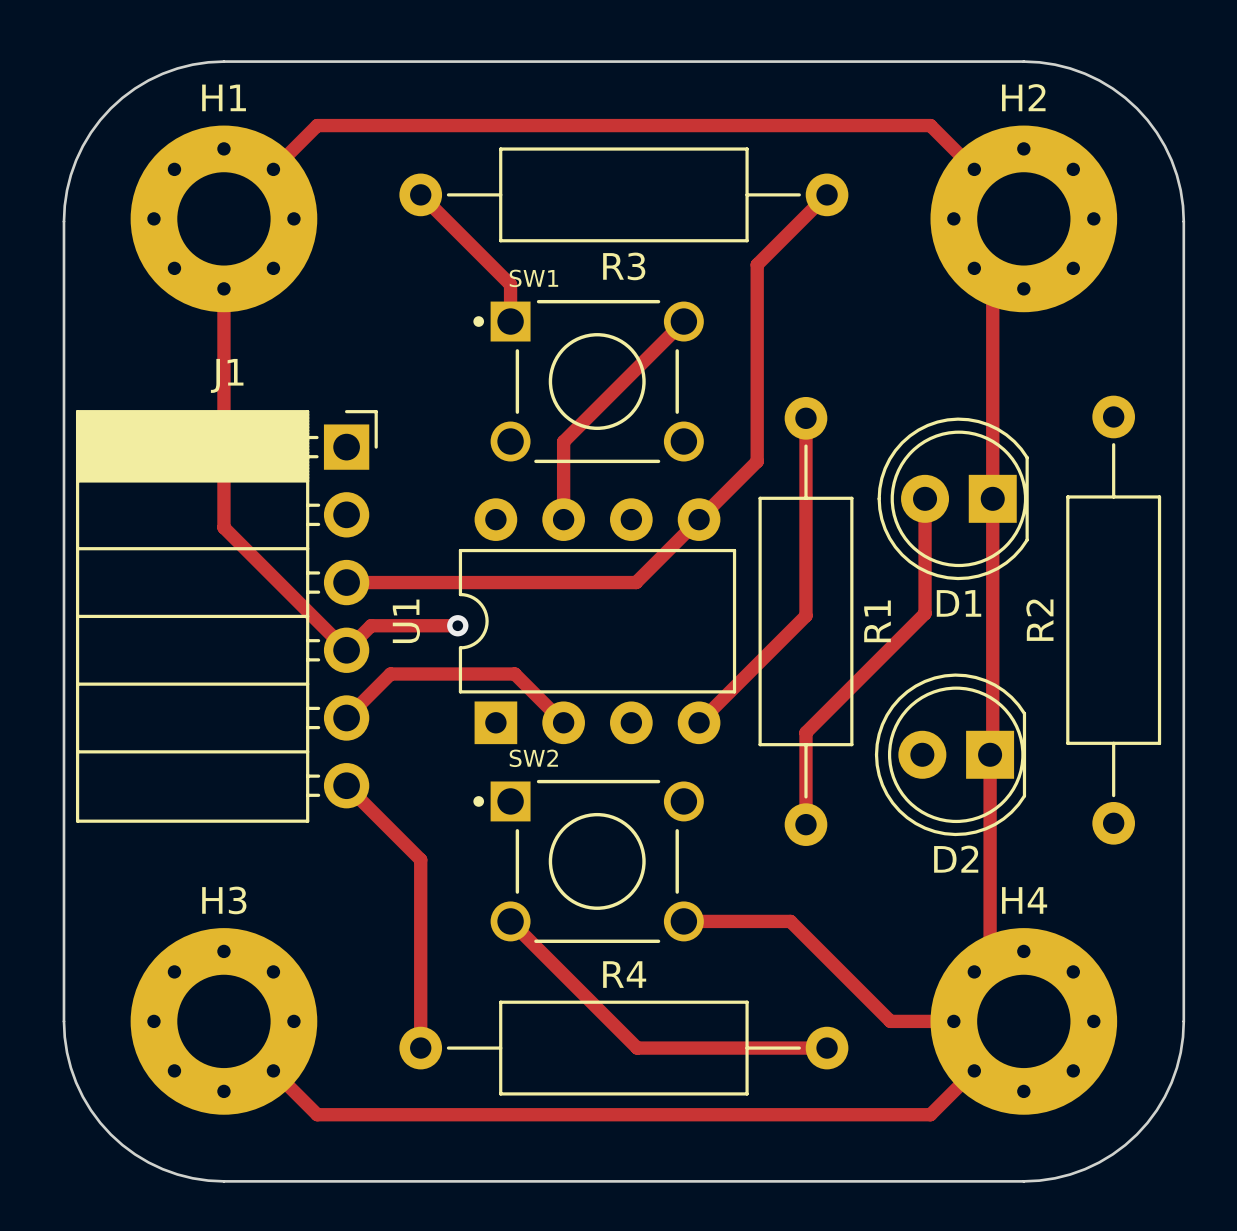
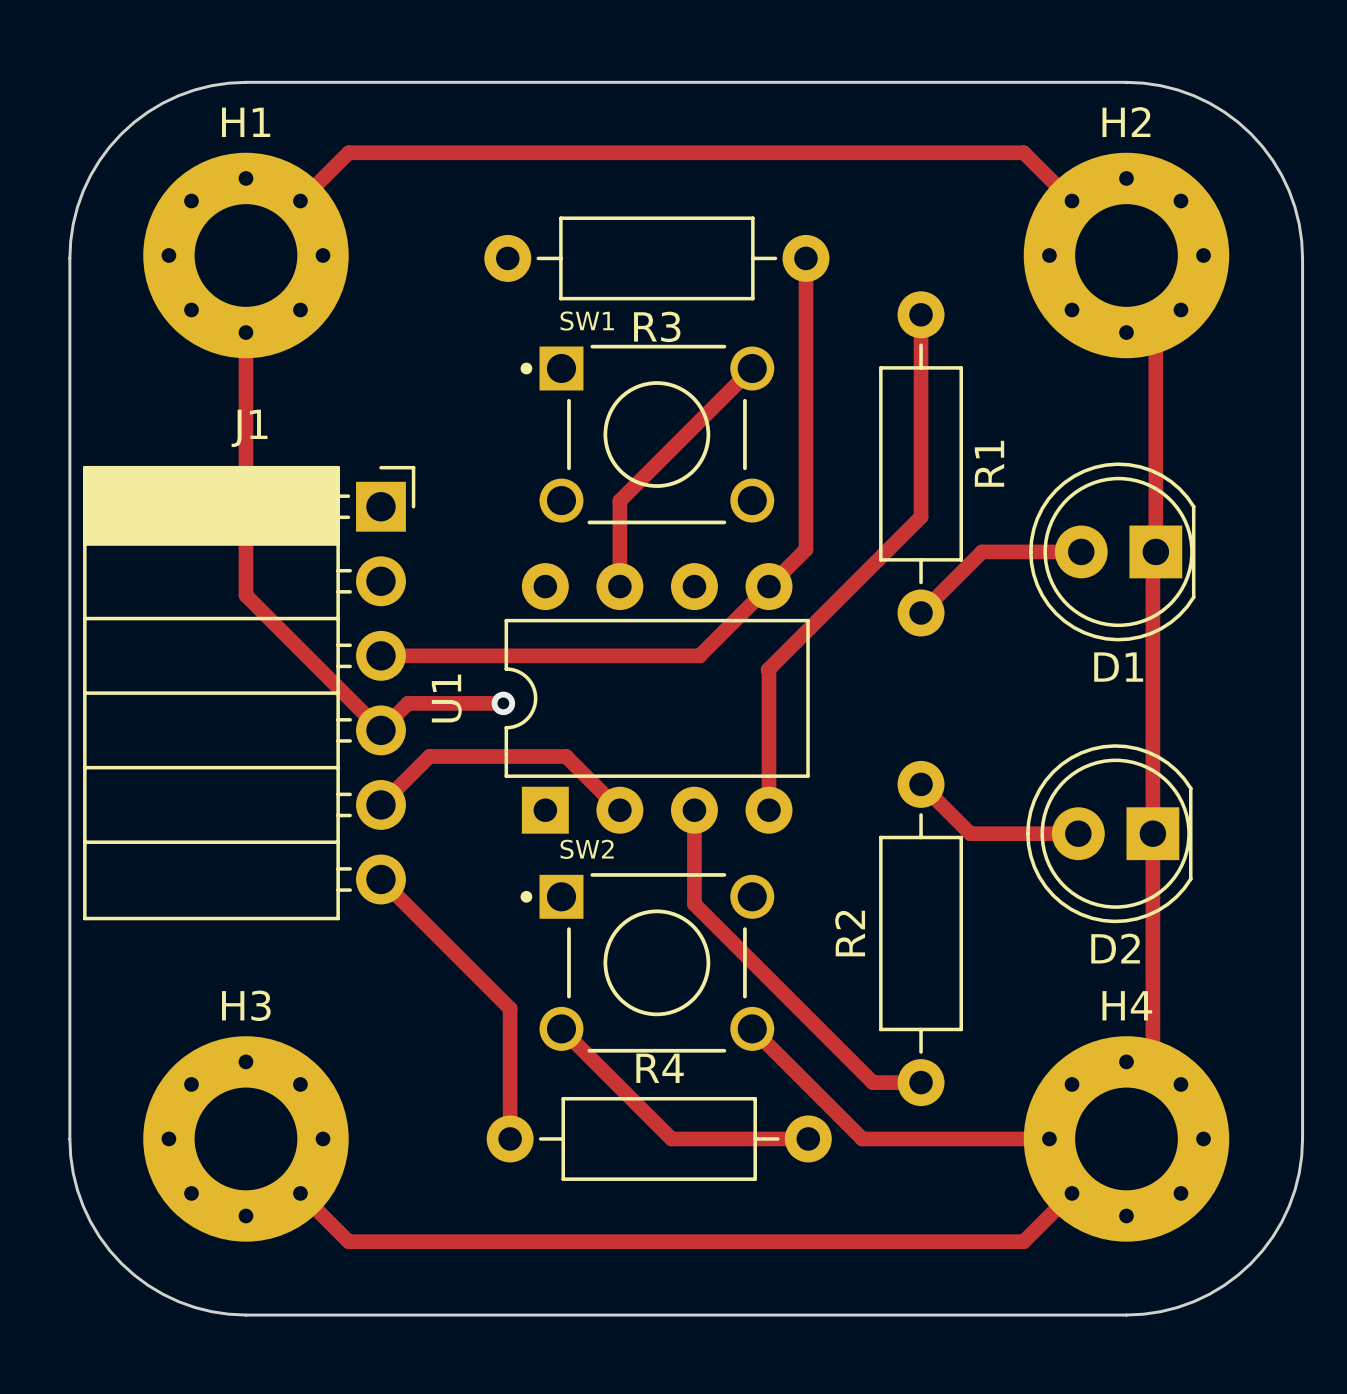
R3 footprint: [399, 147, 849, 243] -> [484, 216, 830, 301]
track: (420, 194) (510, 284) (510, 321) -> none
track: (827, 194) (757, 264) (757, 461) (732, 486) -> (805, 258) (805, 549)
track: (1023, 218) (992, 249) (992, 752) (990, 754) (990, 987) (1023, 1021) -> none
track: none -> (1155, 284) (1155, 551) (1152, 554) (1152, 1112)
R2 footprint: [1066, 395, 1162, 845] -> [879, 760, 964, 1107]
R1 footprint: [758, 396, 854, 846] -> [879, 291, 964, 637]
track: (805, 418) (805, 615) (699, 722) -> (921, 314) (921, 517) (768, 669) (768, 810)
track: none -> (1081, 551) (982, 551) (921, 612)
track: (925, 498) (925, 613) (805, 732) (805, 824) -> none
D1 position: (953, 498) -> (1112, 551)
track: none -> (921, 784) (970, 833) (1078, 833)
track: none -> (694, 810) (694, 904) (872, 1082) (921, 1082)
D2 position: (950, 754) -> (1109, 833)
track: (420, 859) (420, 1048) -> (462, 961) (510, 1008) (510, 1138)
track: (683, 921) (790, 921) (890, 1021) -> (752, 1028) (862, 1138) (979, 1138)
R4 footprint: [399, 1000, 849, 1096] -> [486, 1096, 832, 1181]
track: (610, 1021) (637, 1048) (827, 1048) -> (671, 1138) (808, 1138)

